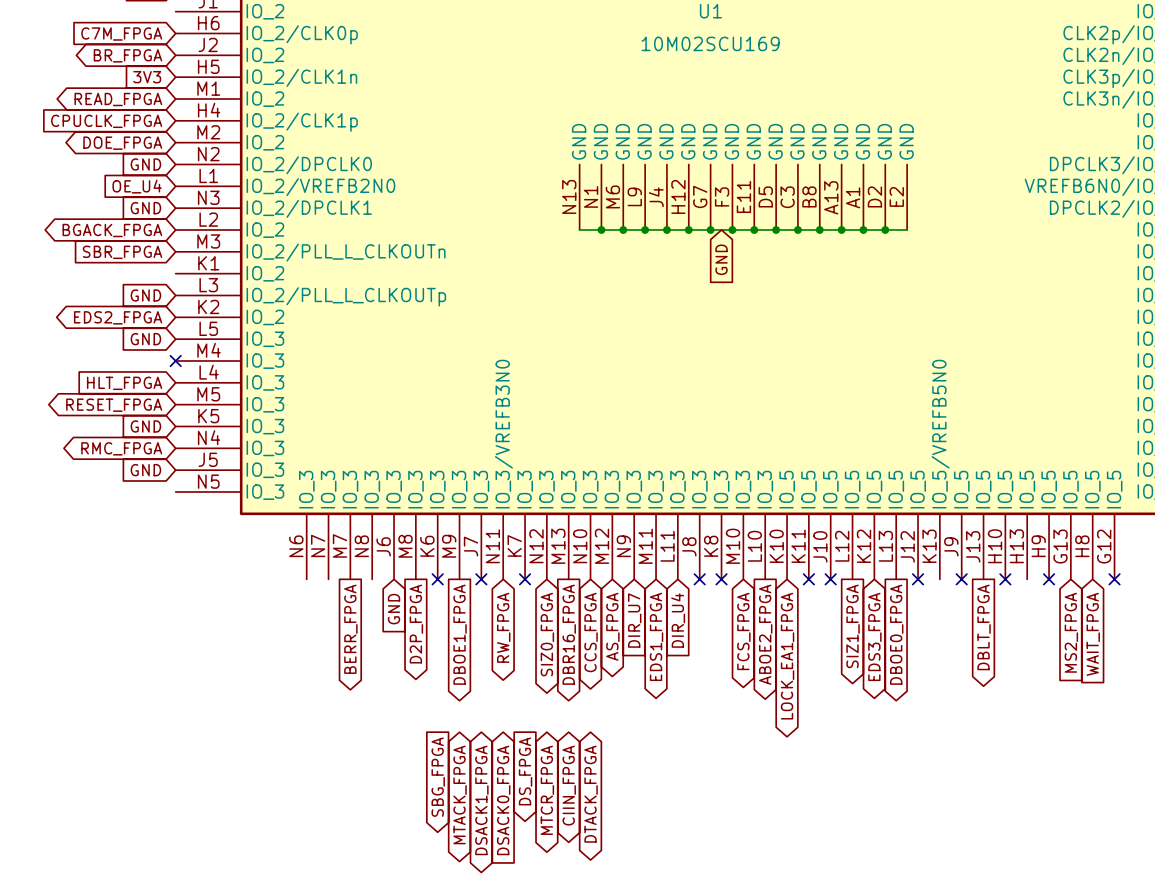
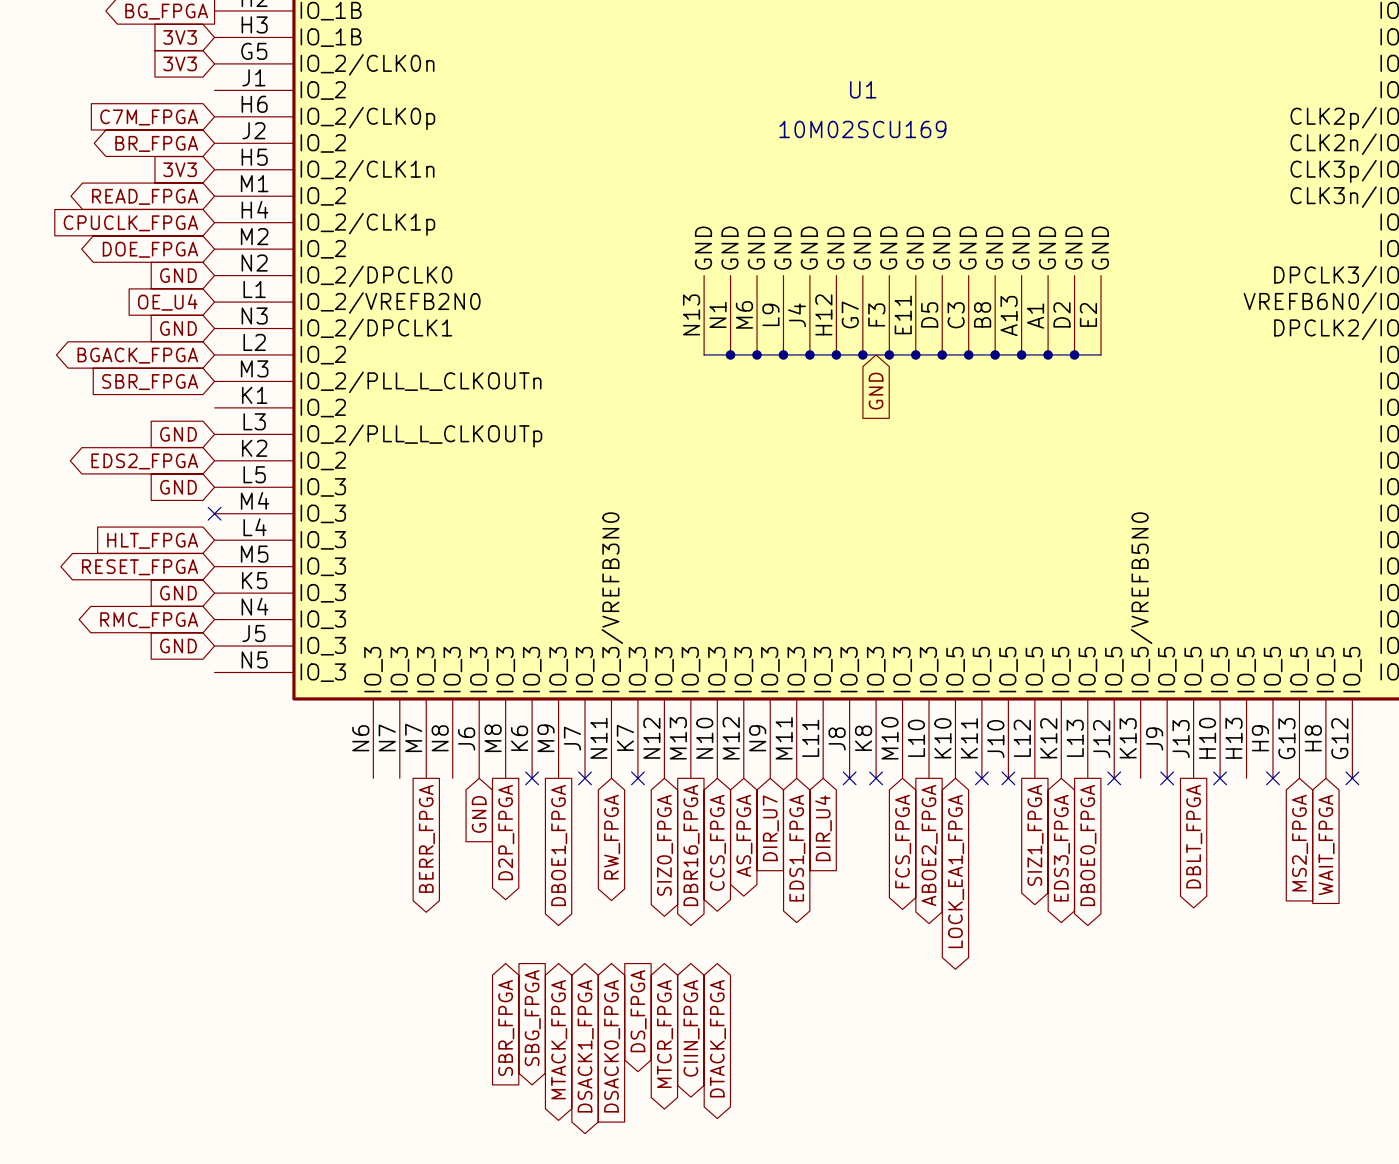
global label: none -> SBR_FPGA (506, 1028)

